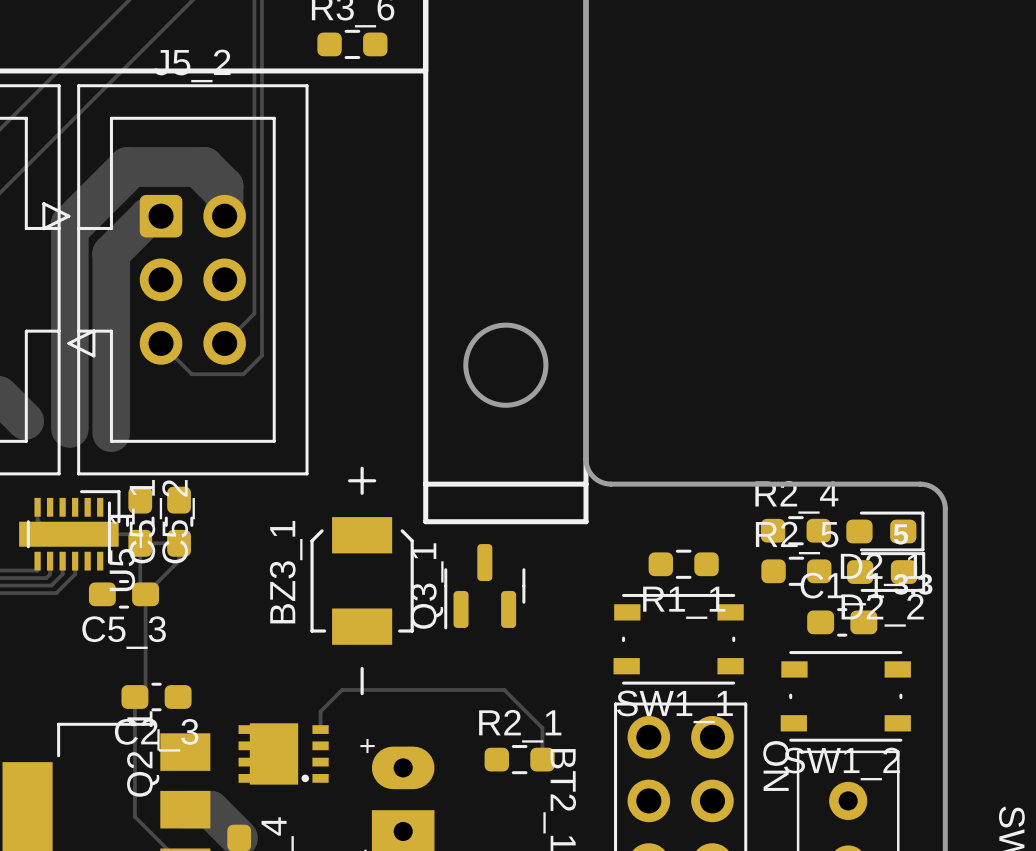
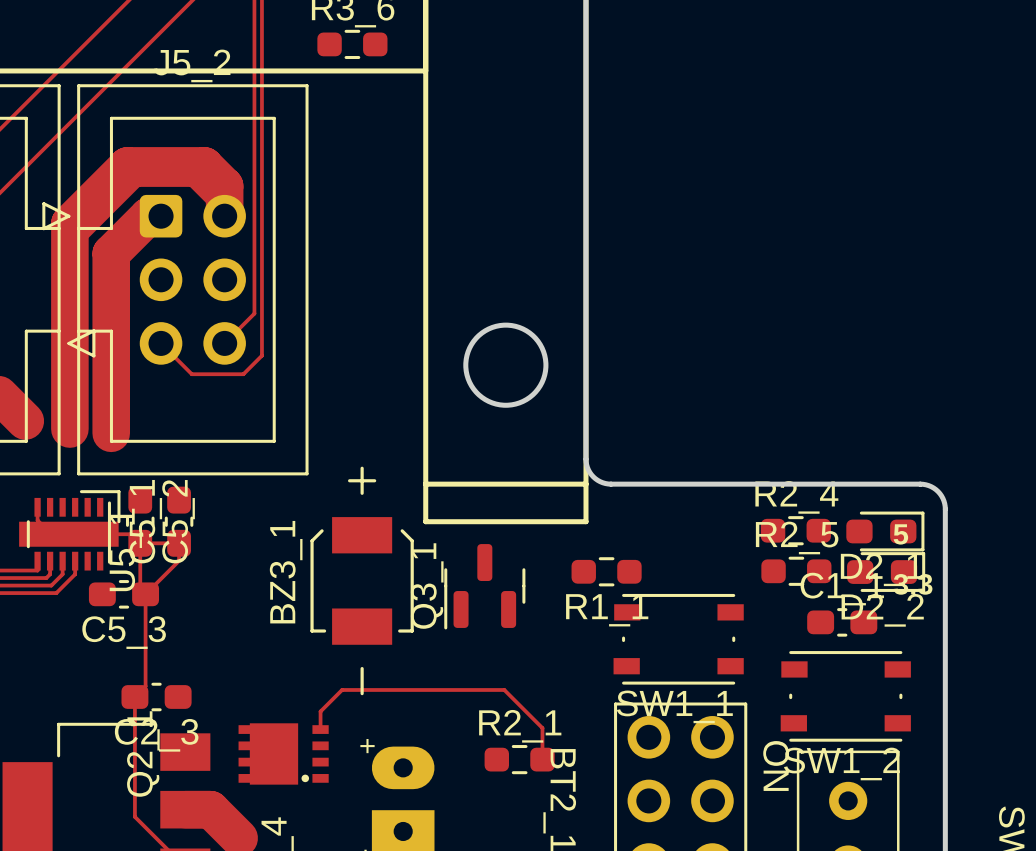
R1_1 position: (683, 564) -> (606, 571)

